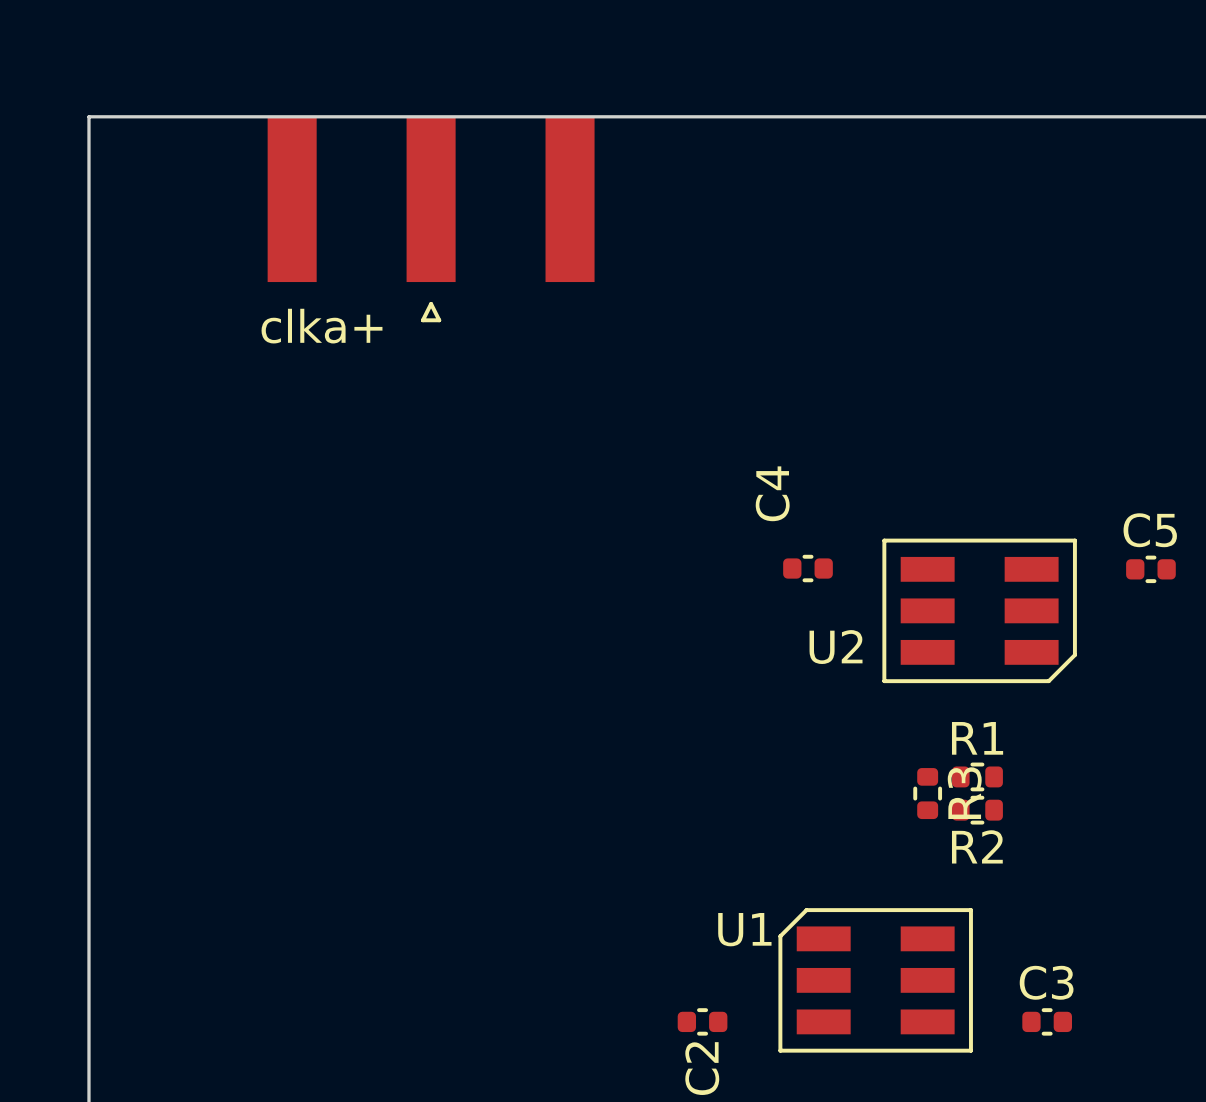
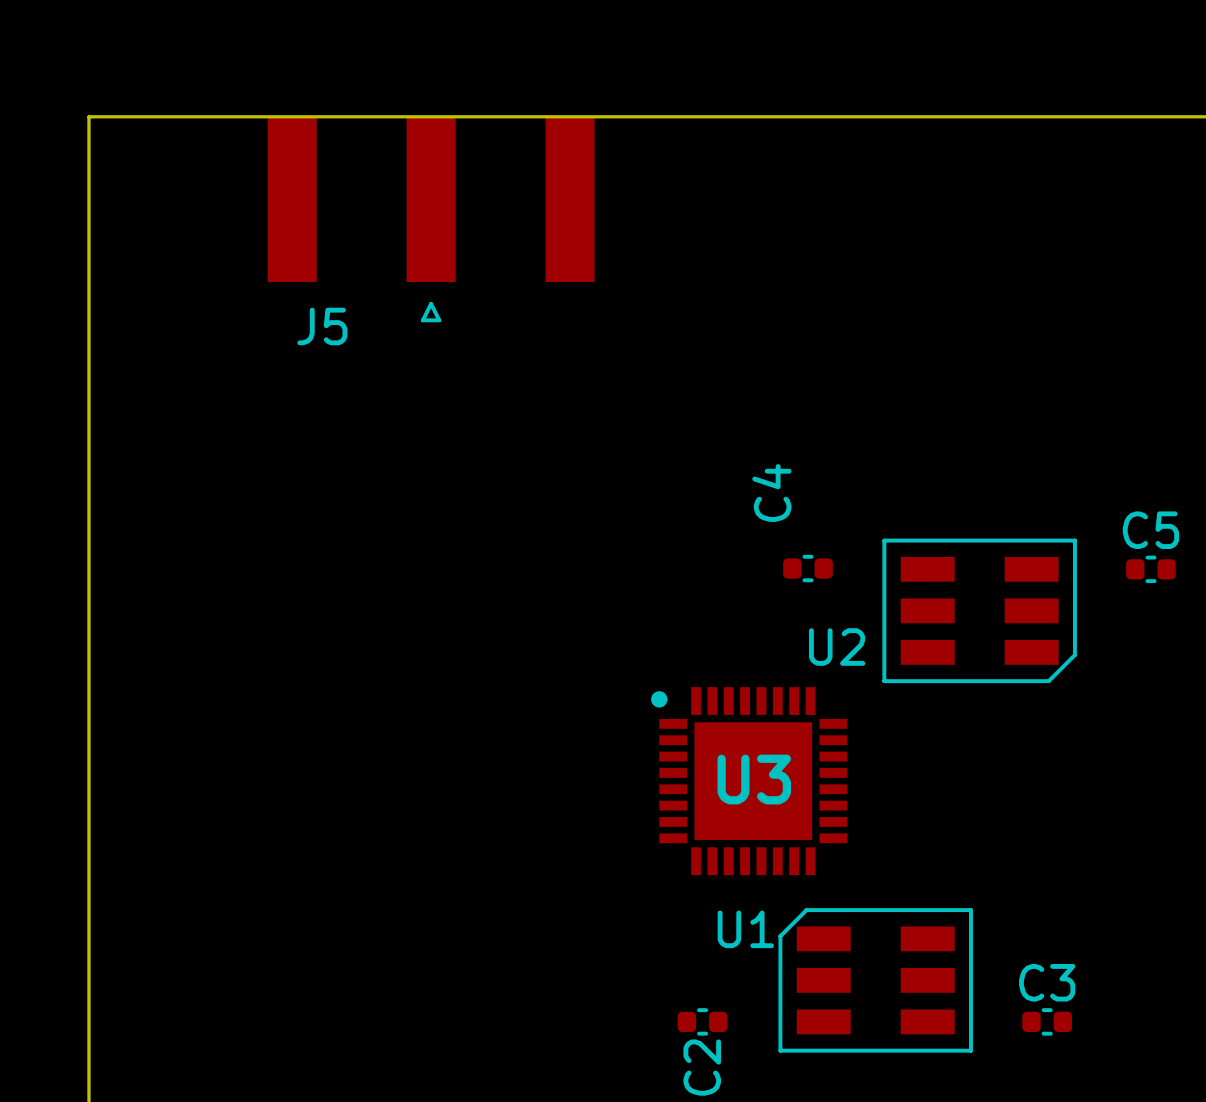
clka+ name: clka+ (322, 326) -> J5 (322, 326)
R1: (977, 776) -> none
U3: none -> (749, 781)
R3: (927, 793) -> none
R2: (977, 810) -> none

